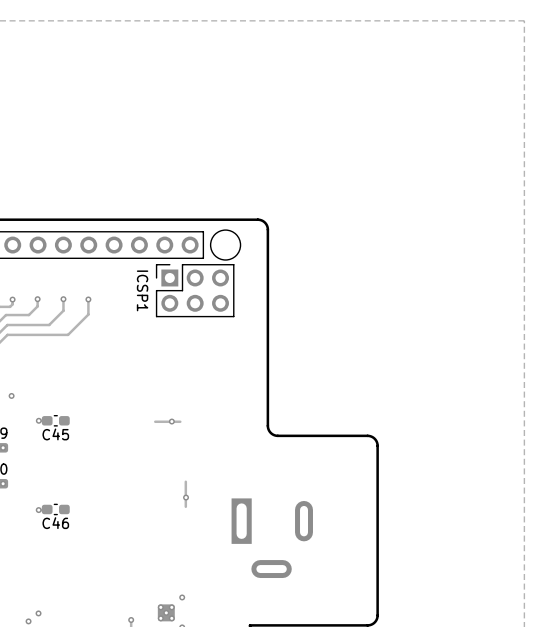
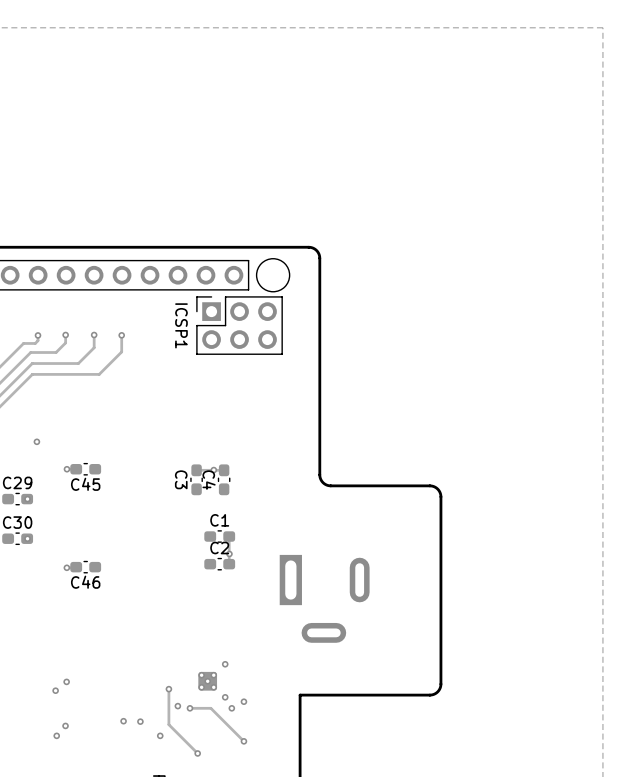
C3: none -> (196, 479)
C4: none -> (224, 479)
C1: none -> (219, 536)
C2: none -> (219, 564)

